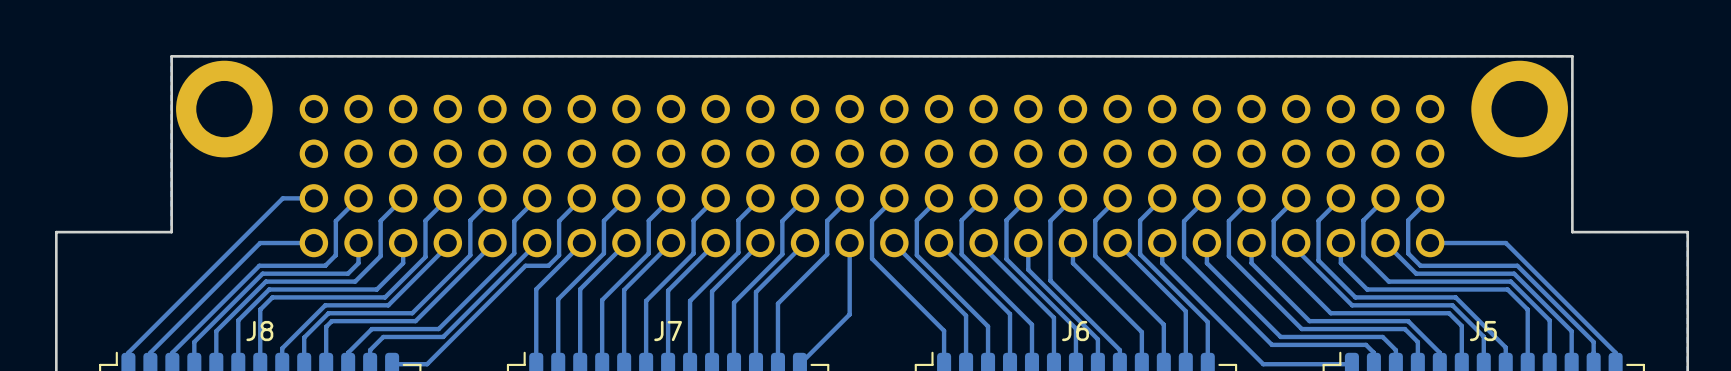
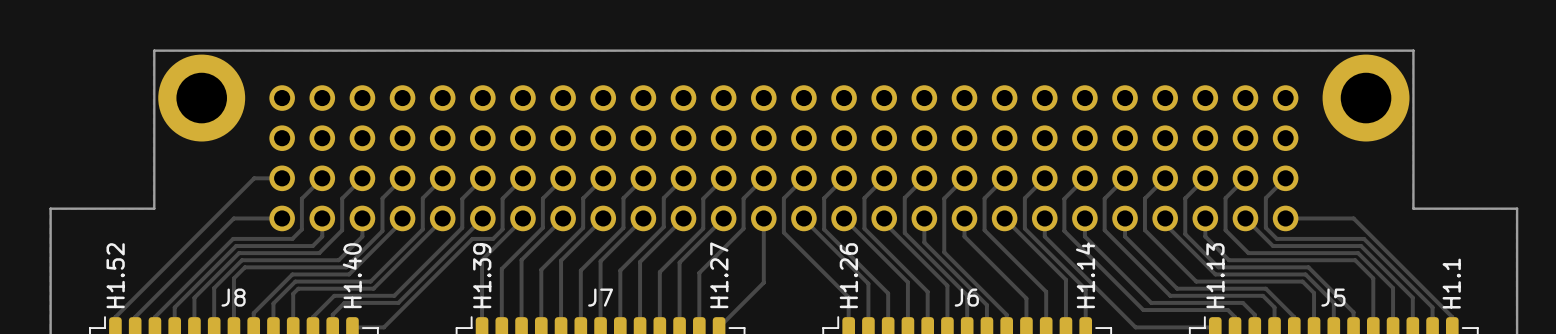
text: none -> H1.52 (115, 275)
text: none -> H1.40 (352, 275)
text: none -> H1.39 (482, 275)
text: none -> H1.27 (719, 275)
text: none -> H1.26 (848, 275)
text: none -> H1.14 (1085, 275)
text: none -> H1.13 (1215, 275)
text: none -> H1.1 (1451, 283)

